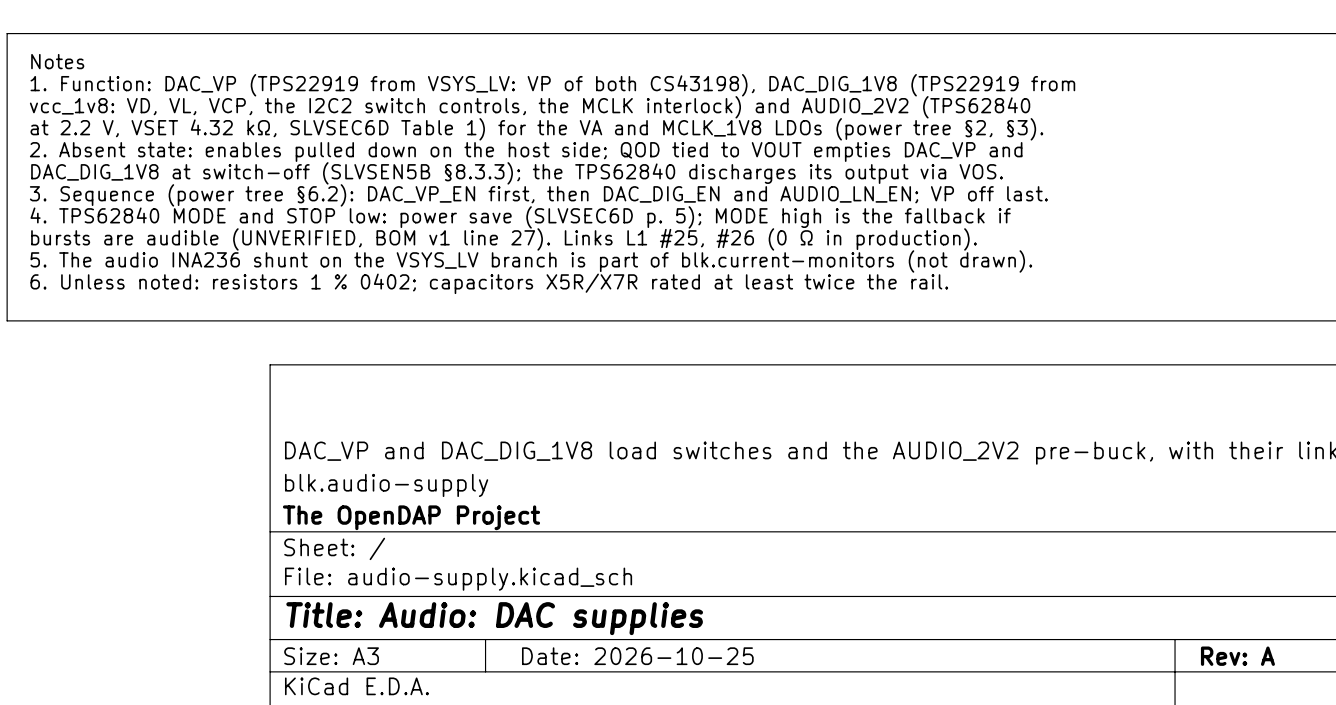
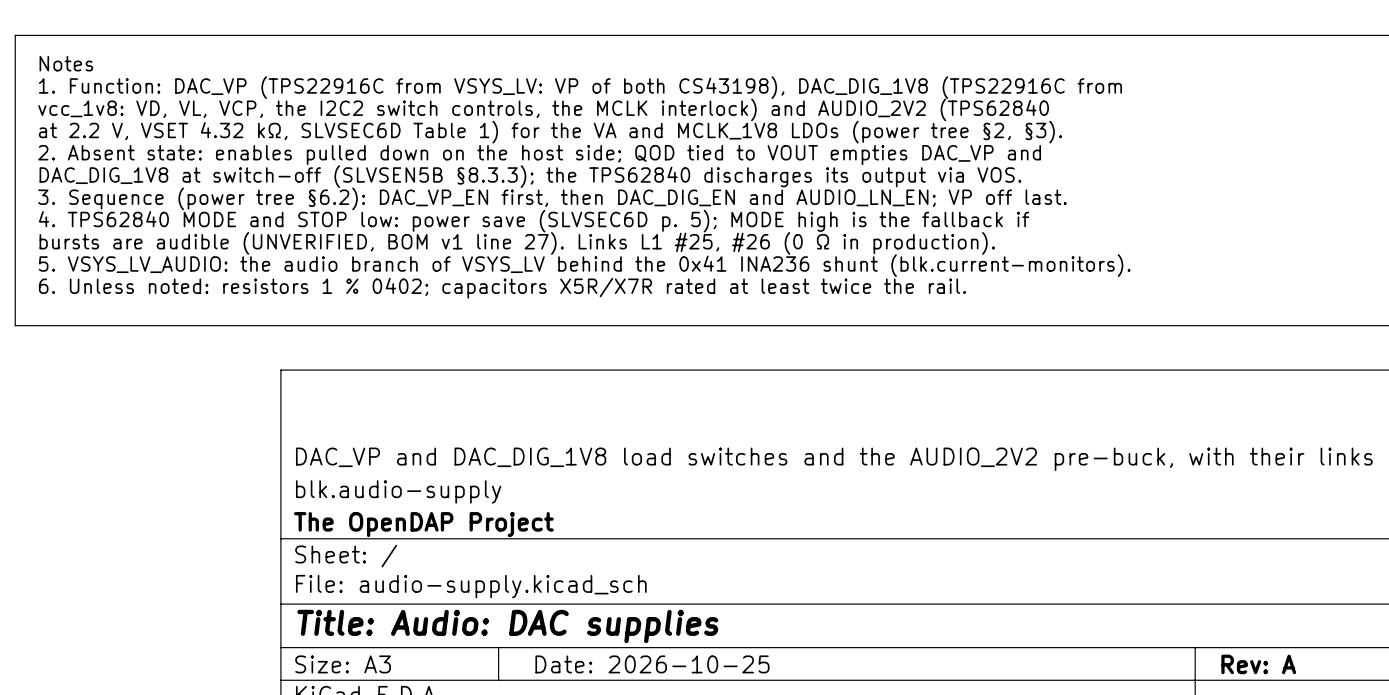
text: 1. Function: DAC_VP (TPS22919 from VSYS_LV: VP of both CS43198), DAC_DIG_1V8 (TPS22919 from (552, 85) -> 1. Function: DAC_VP (TPS22916C from VSYS_LV: VP of both CS43198), DAC_DIG_1V8 (TPS22916C from (580, 87)
text: 5. The audio INA236 shunt on the VSYS_LV branch is part of blk.current-monitors (not drawn). (531, 261) -> 5. VSYS_LV_AUDIO: the audio branch of VSYS_LV behind the 0x41 INA236 shunt (blk.current-monitors). (584, 265)

